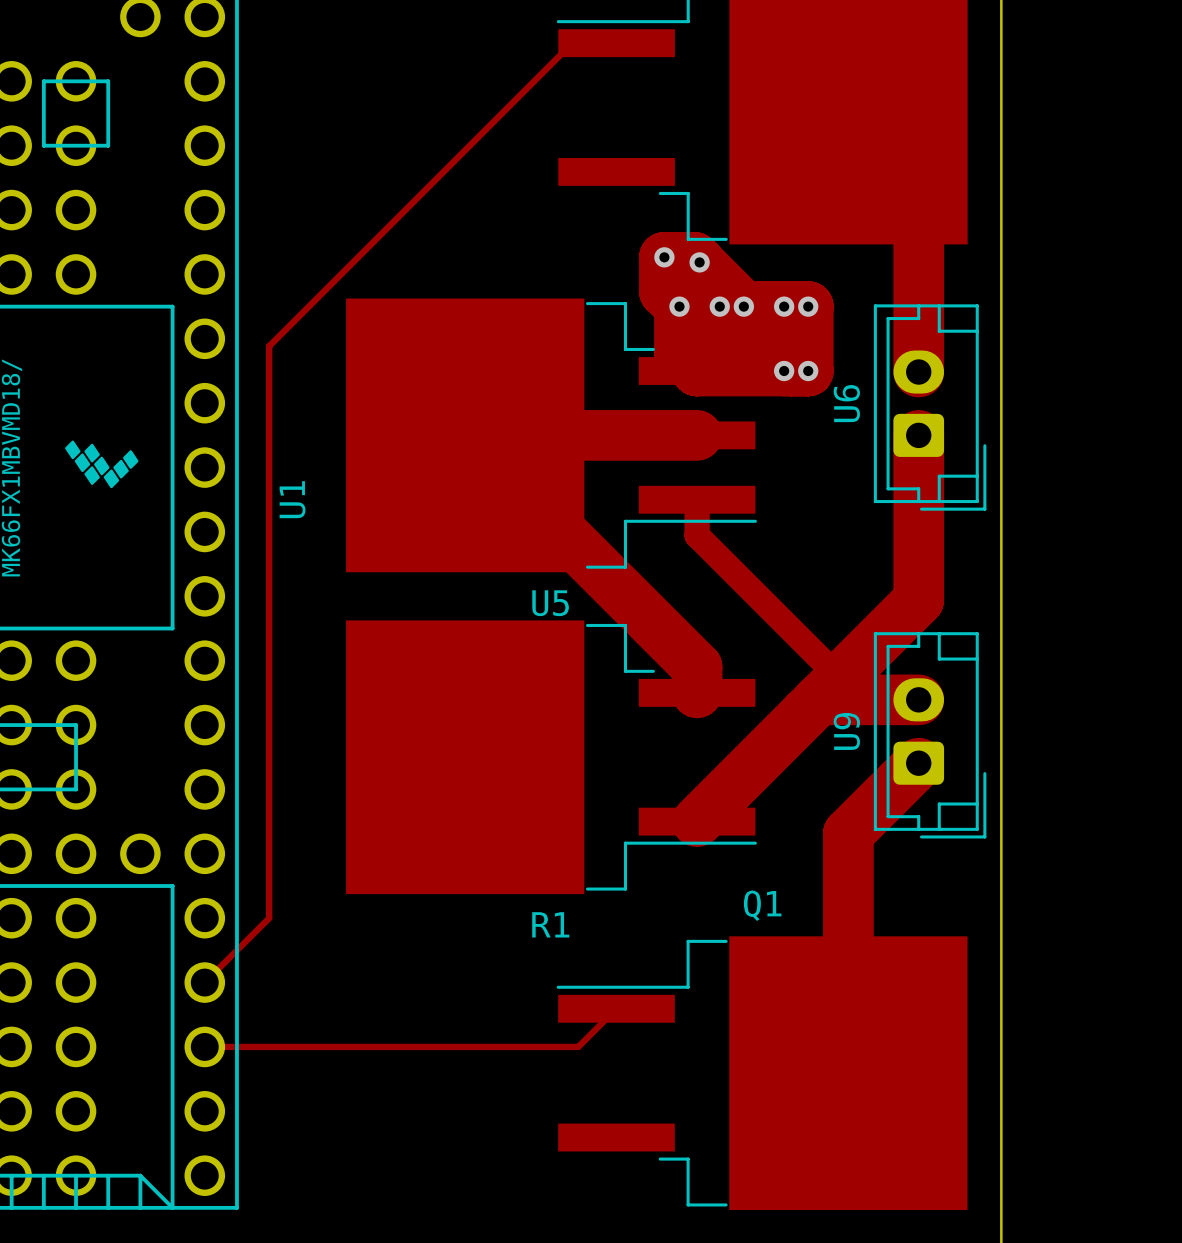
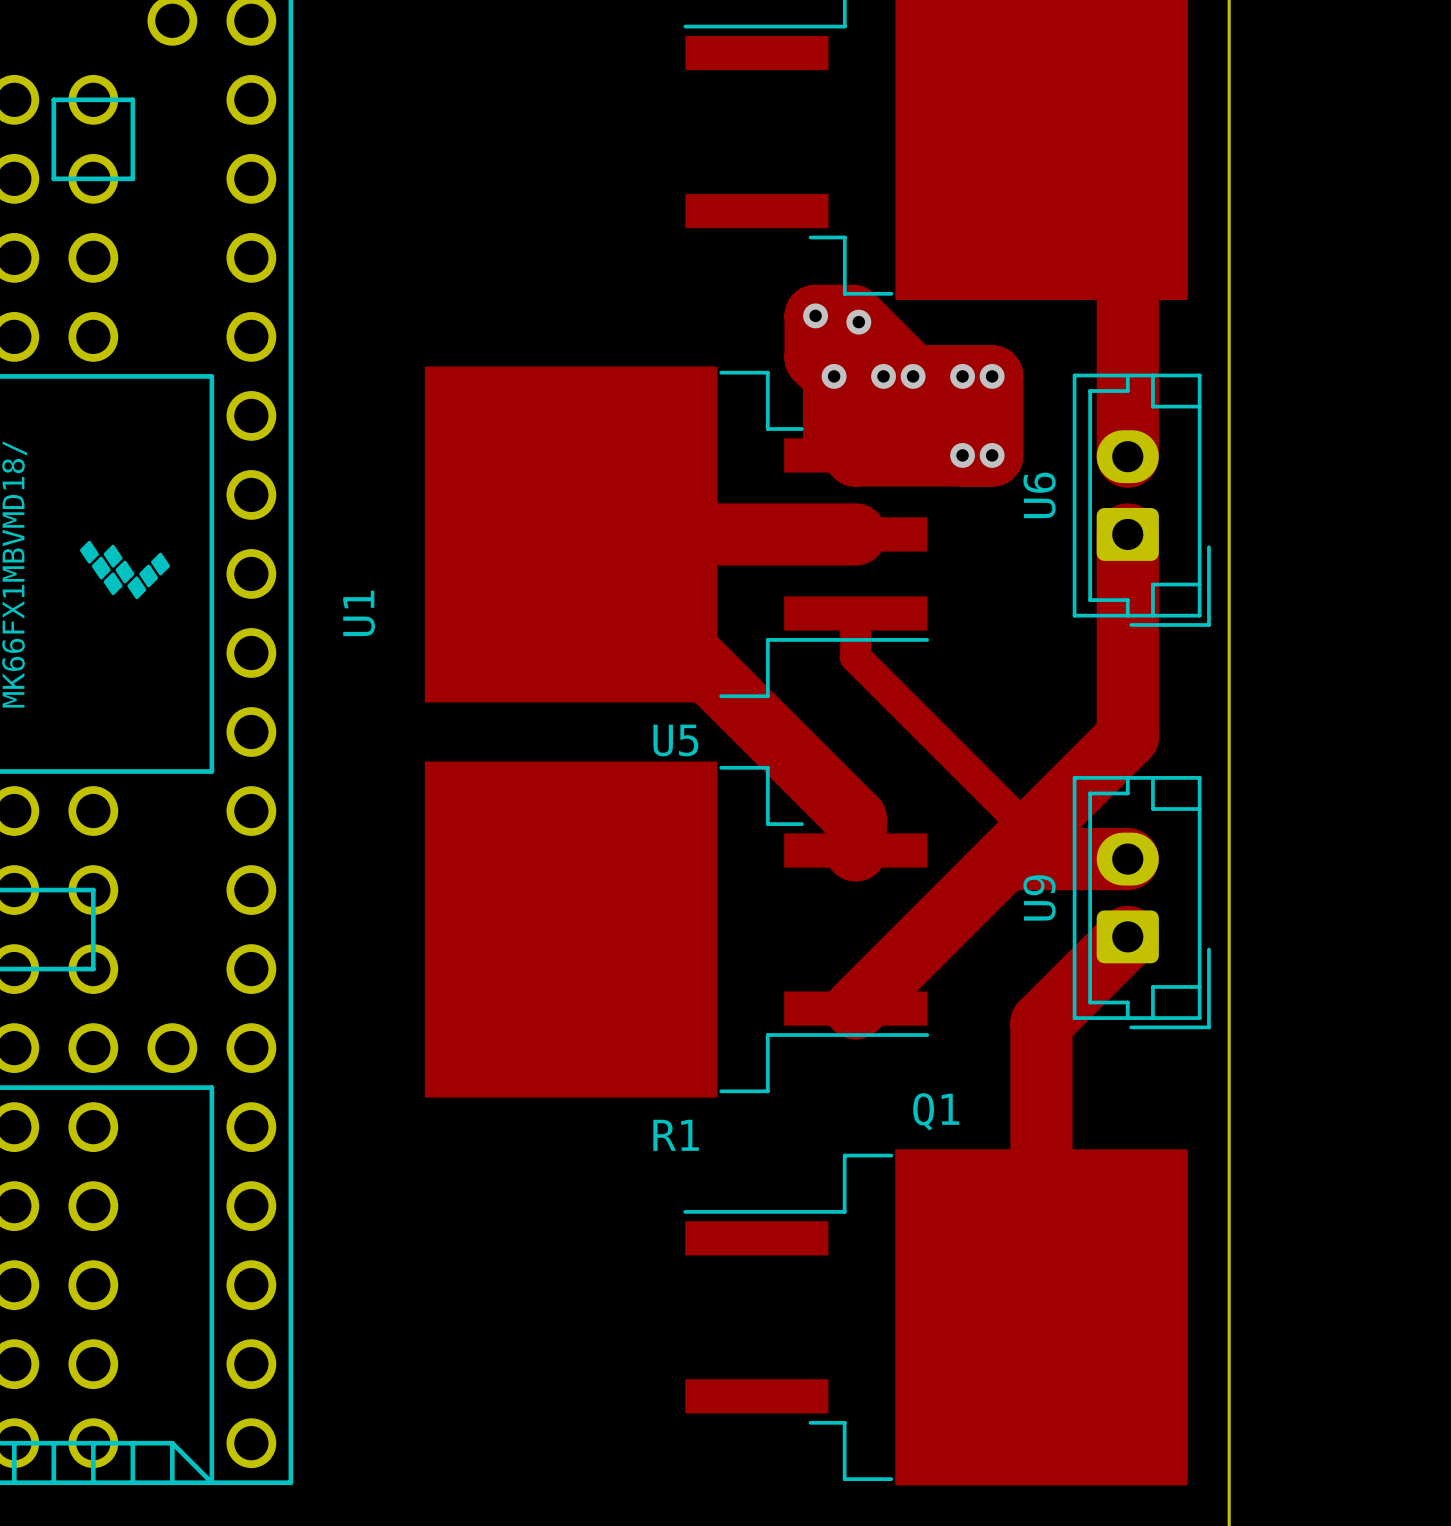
track: (616, 43) (572, 43) (269, 346) (269, 918) (204, 982) -> none
track: (616, 1008) (578, 1046) (204, 1046) -> none

